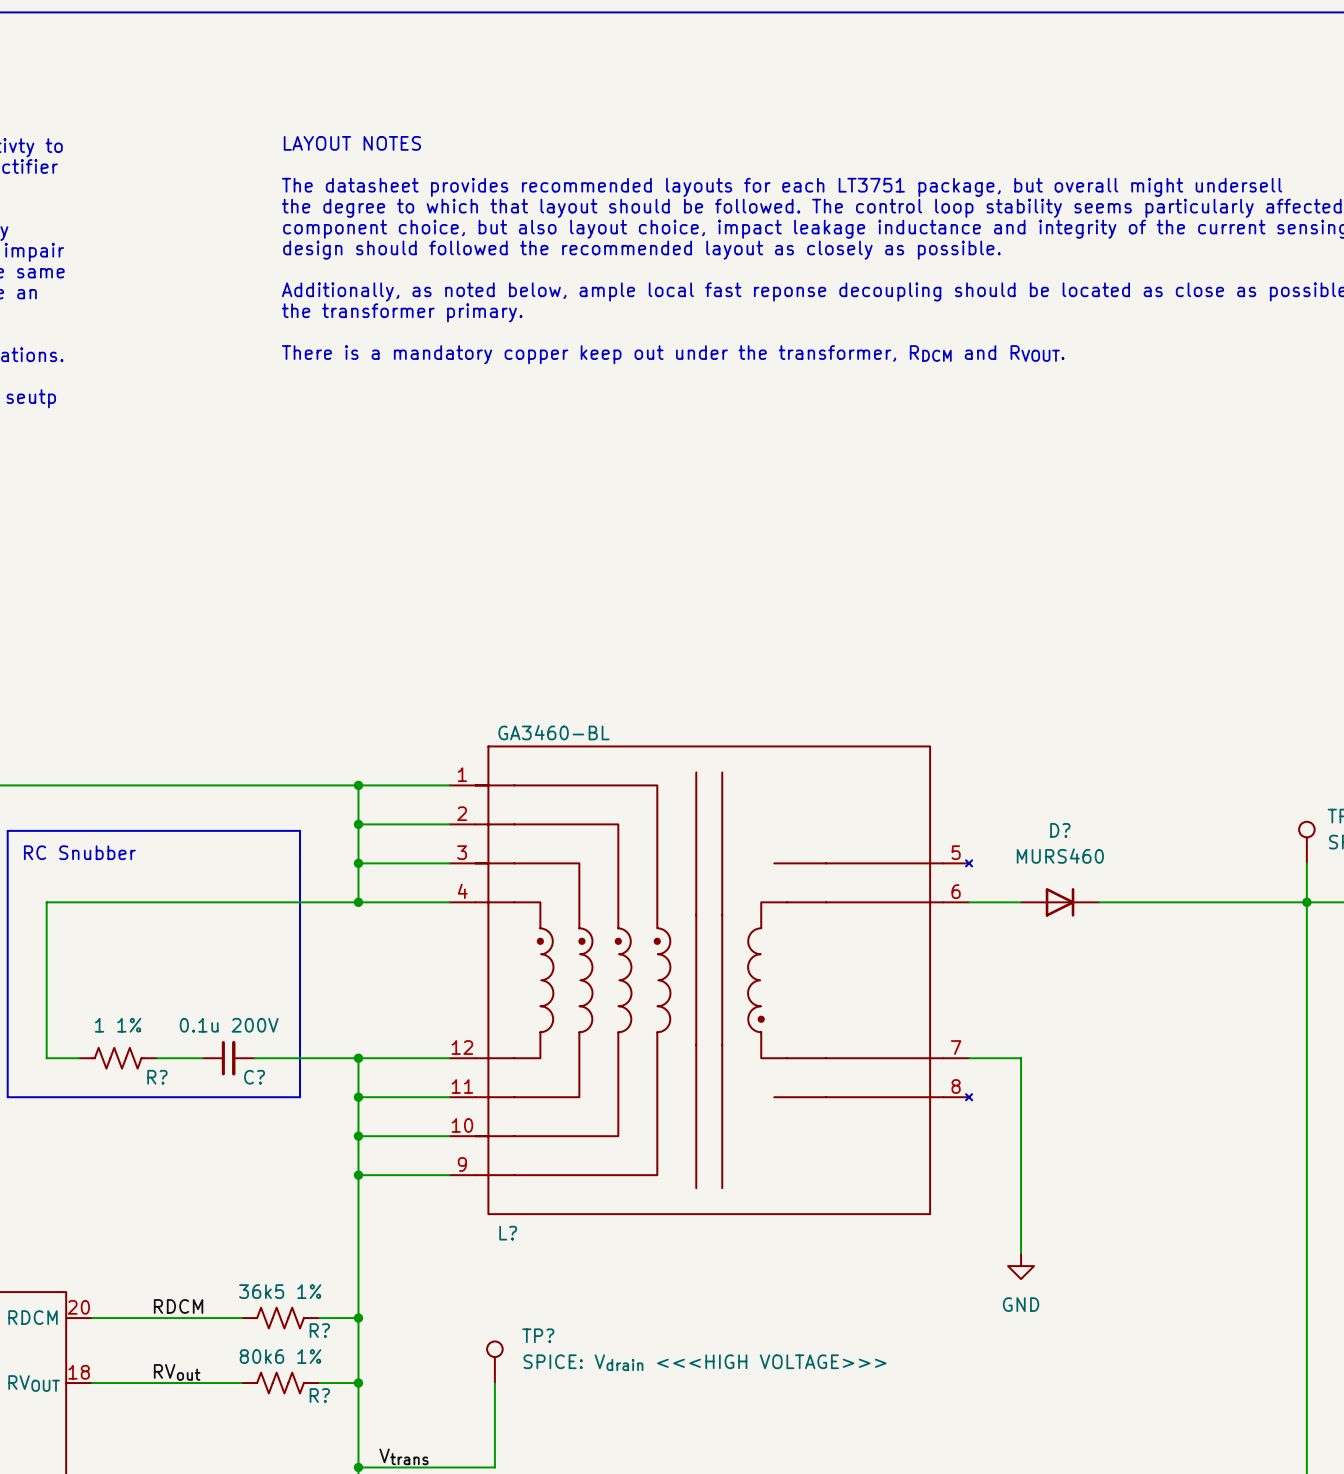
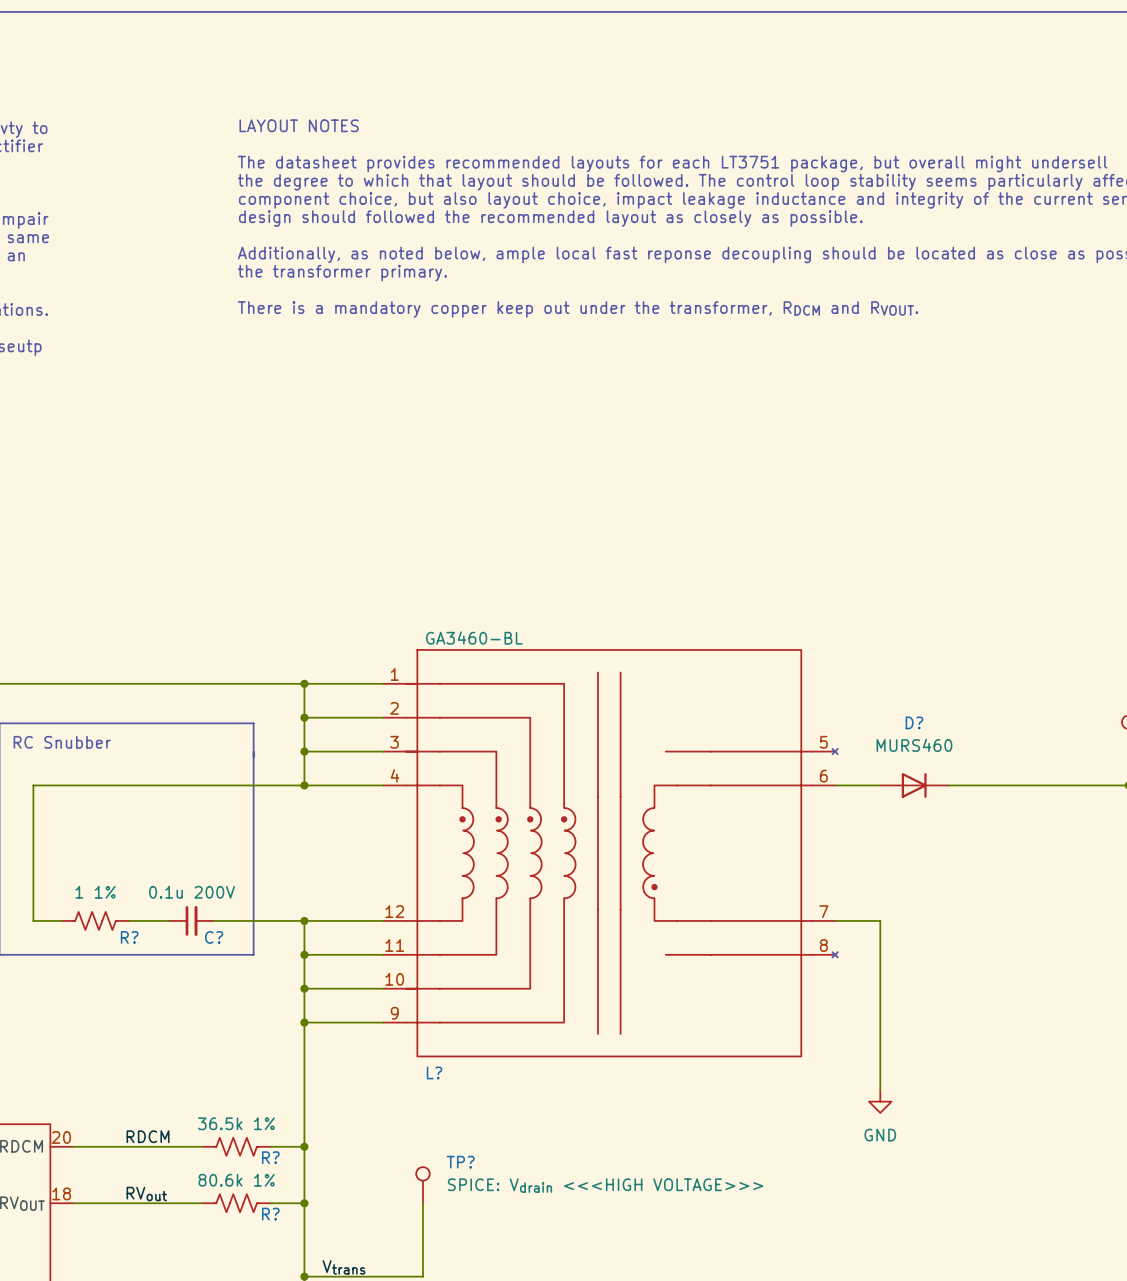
R? value: 36k5 1% (280, 1291) -> 36.5k 1% (236, 1123)
R? value: 80k6 1% (280, 1356) -> 80.6k 1% (236, 1180)

